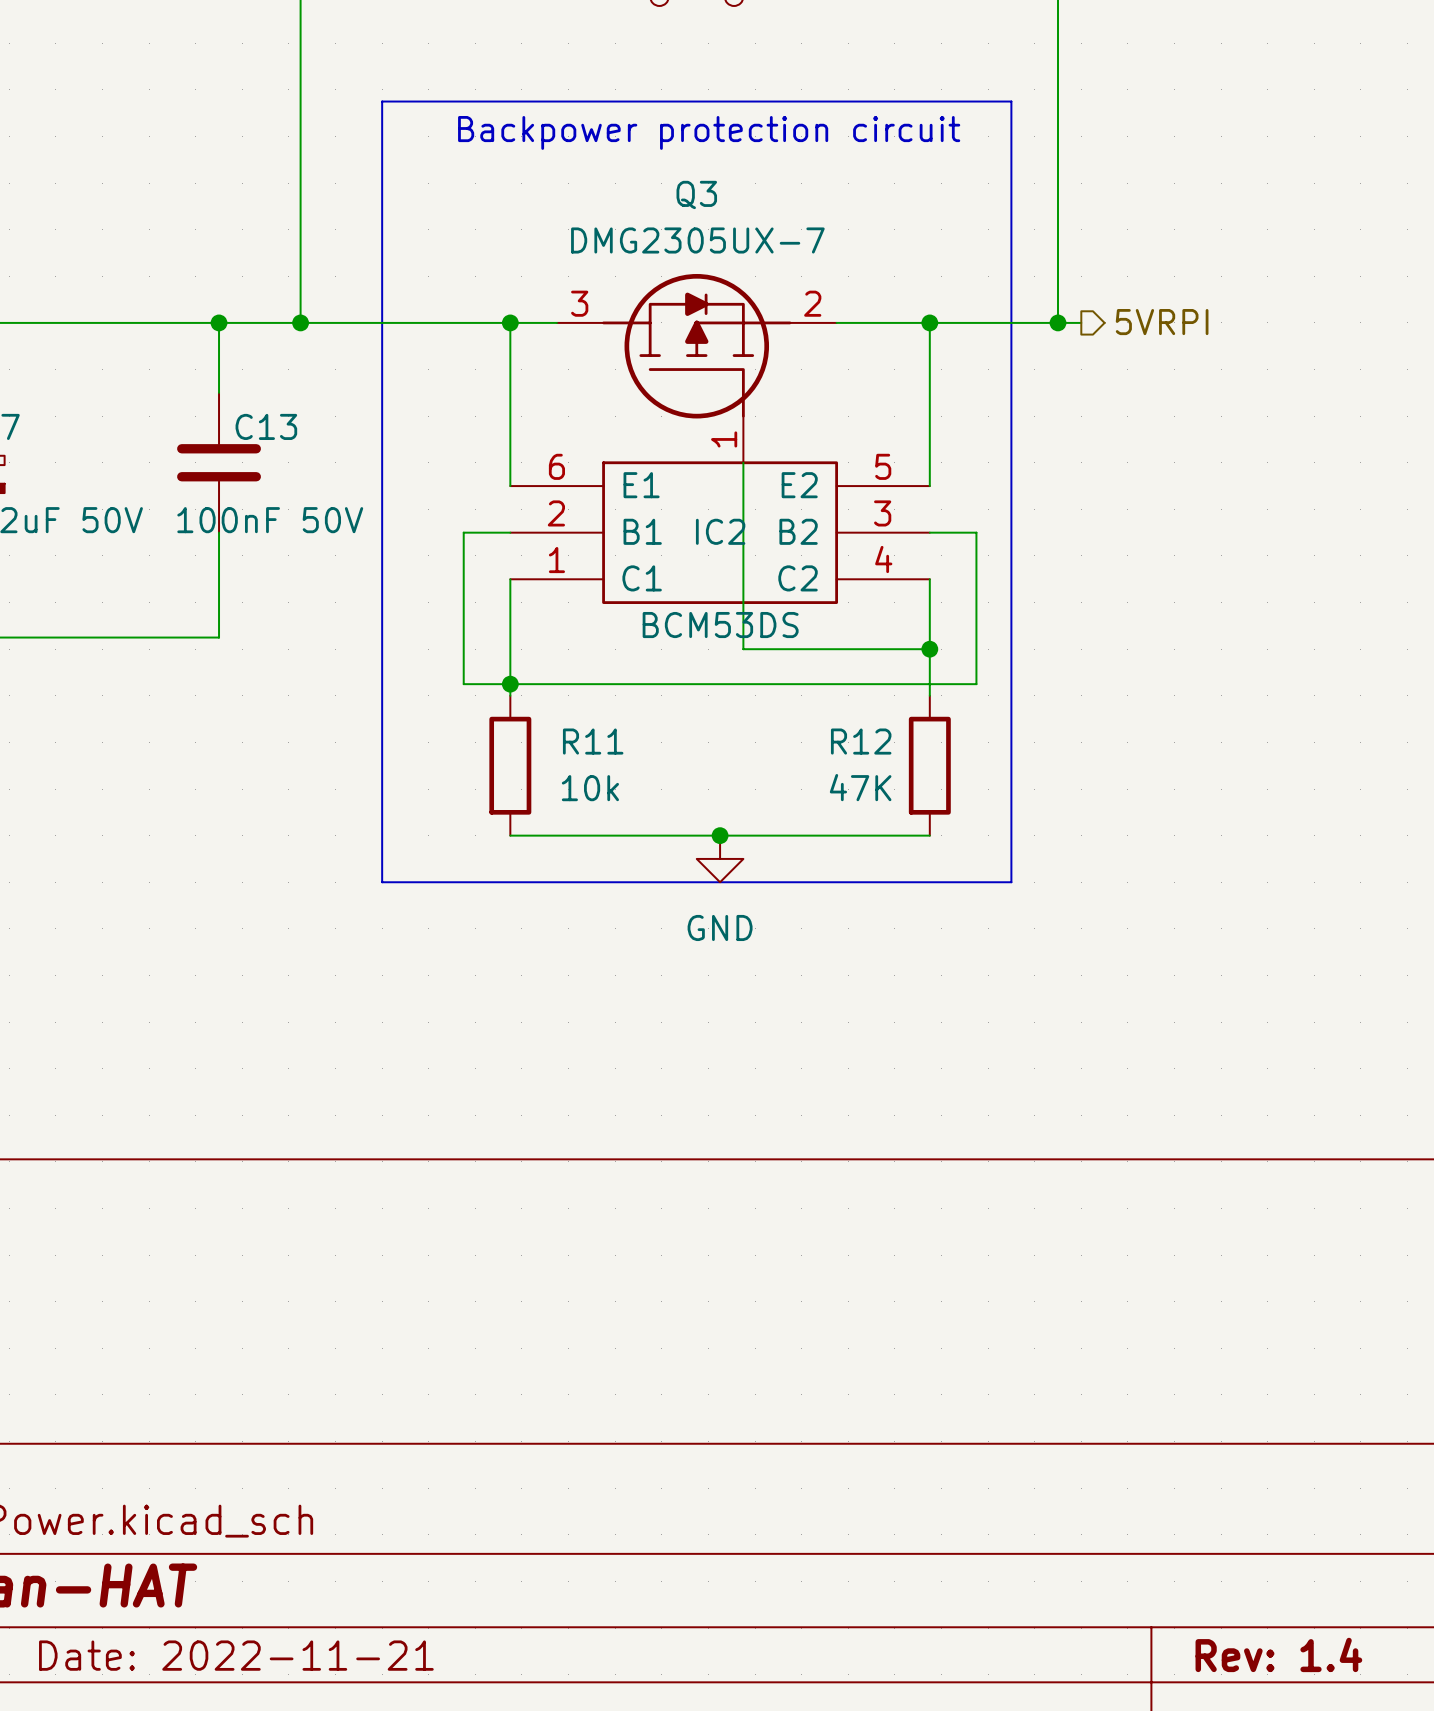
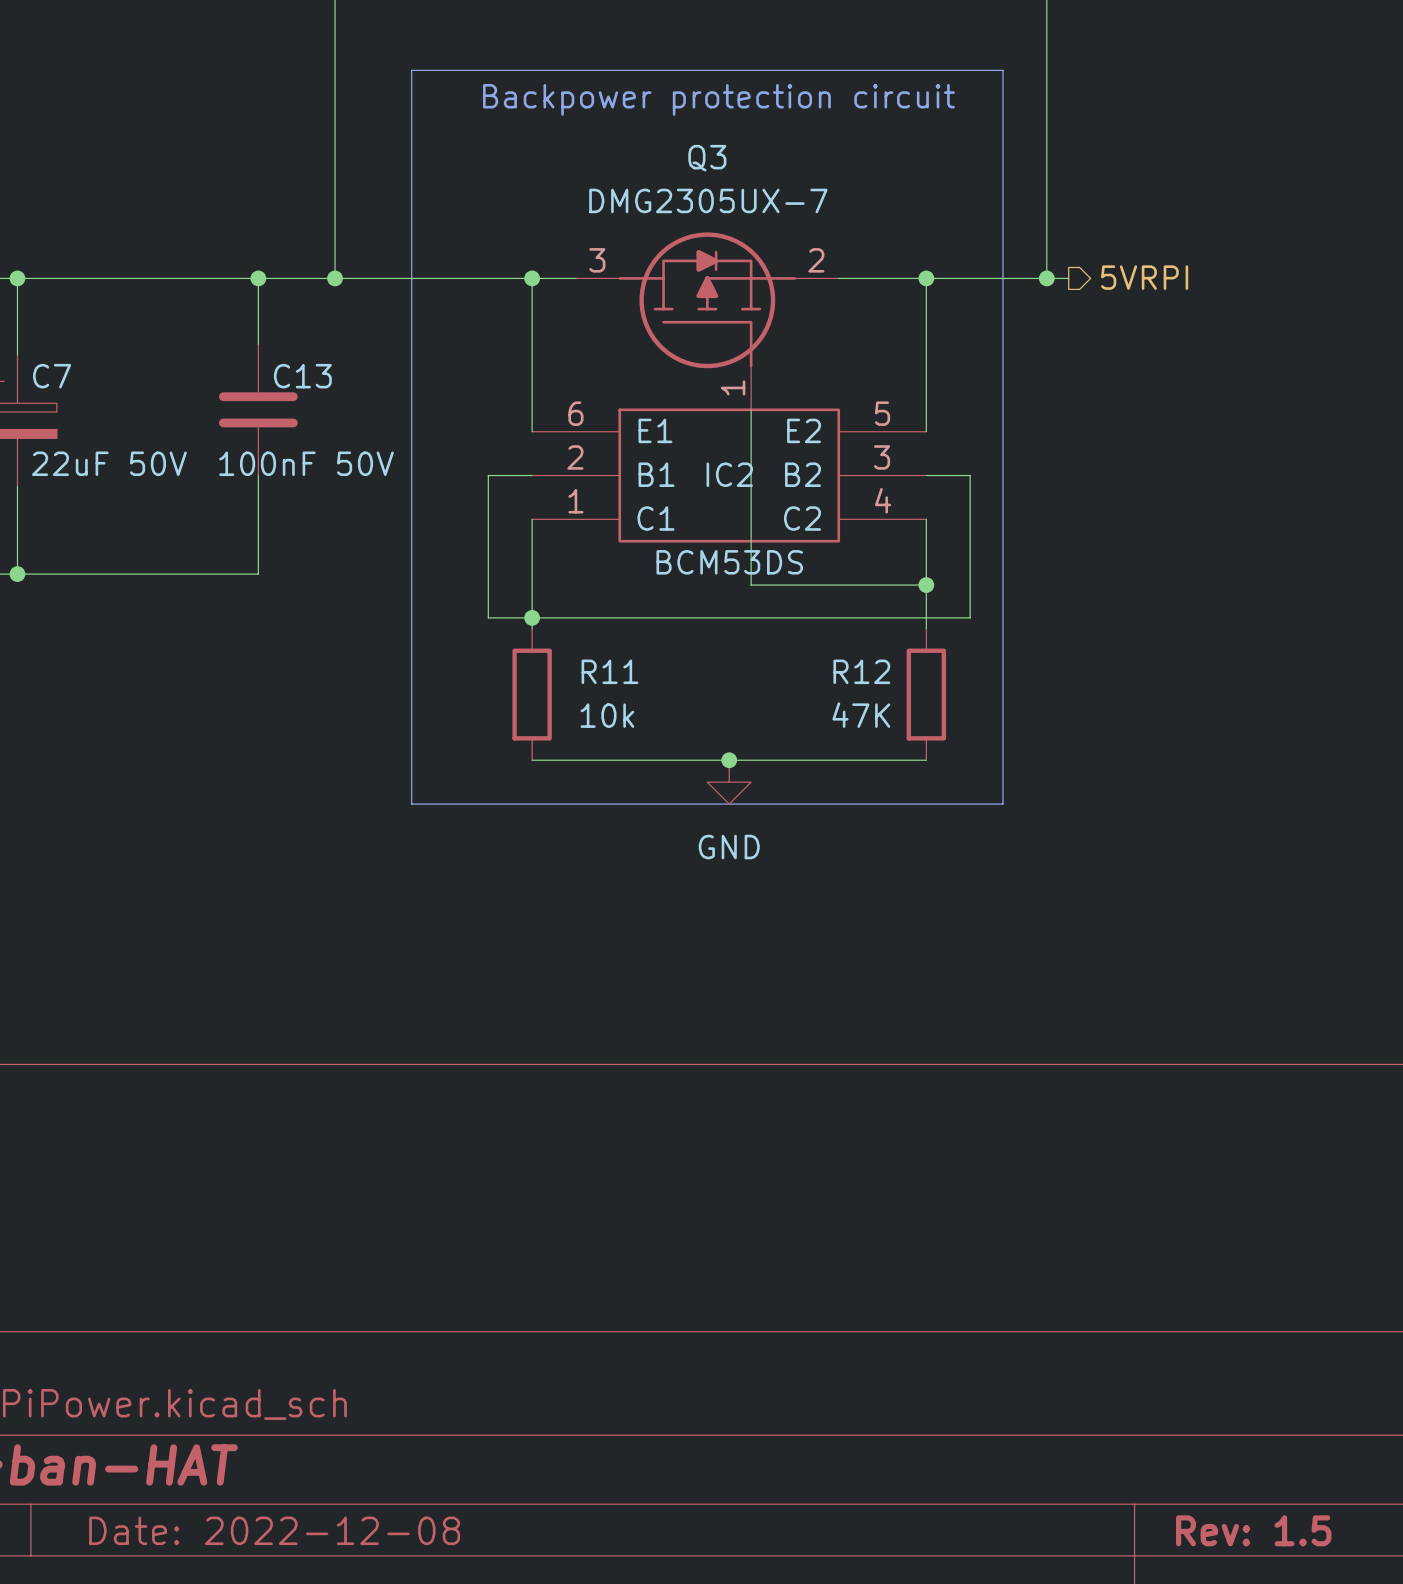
title block: Rev: 1.4 (1278, 1654) -> Rev: 1.5 (1253, 1530)
title block: Date: 2022-11-21 (236, 1655) -> Date: 2022-12-08 (274, 1530)

